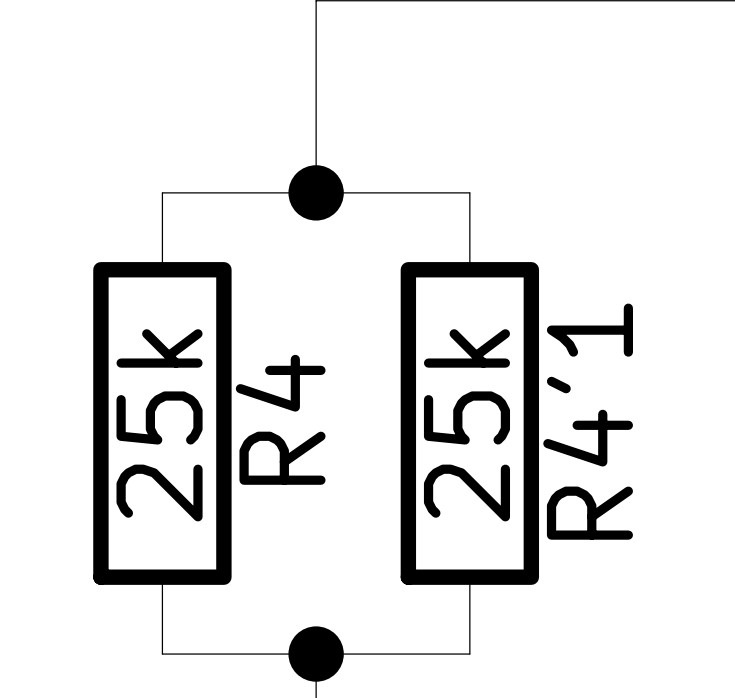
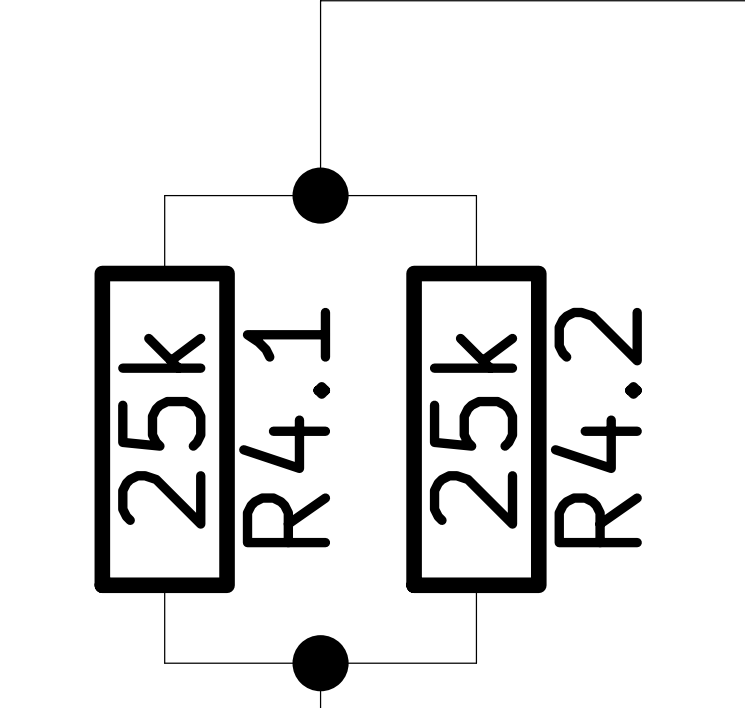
R4 name: R4 (280, 419) -> R4.1 (284, 427)
R4'1 name: R4'1 (588, 421) -> R4.2 (596, 427)

